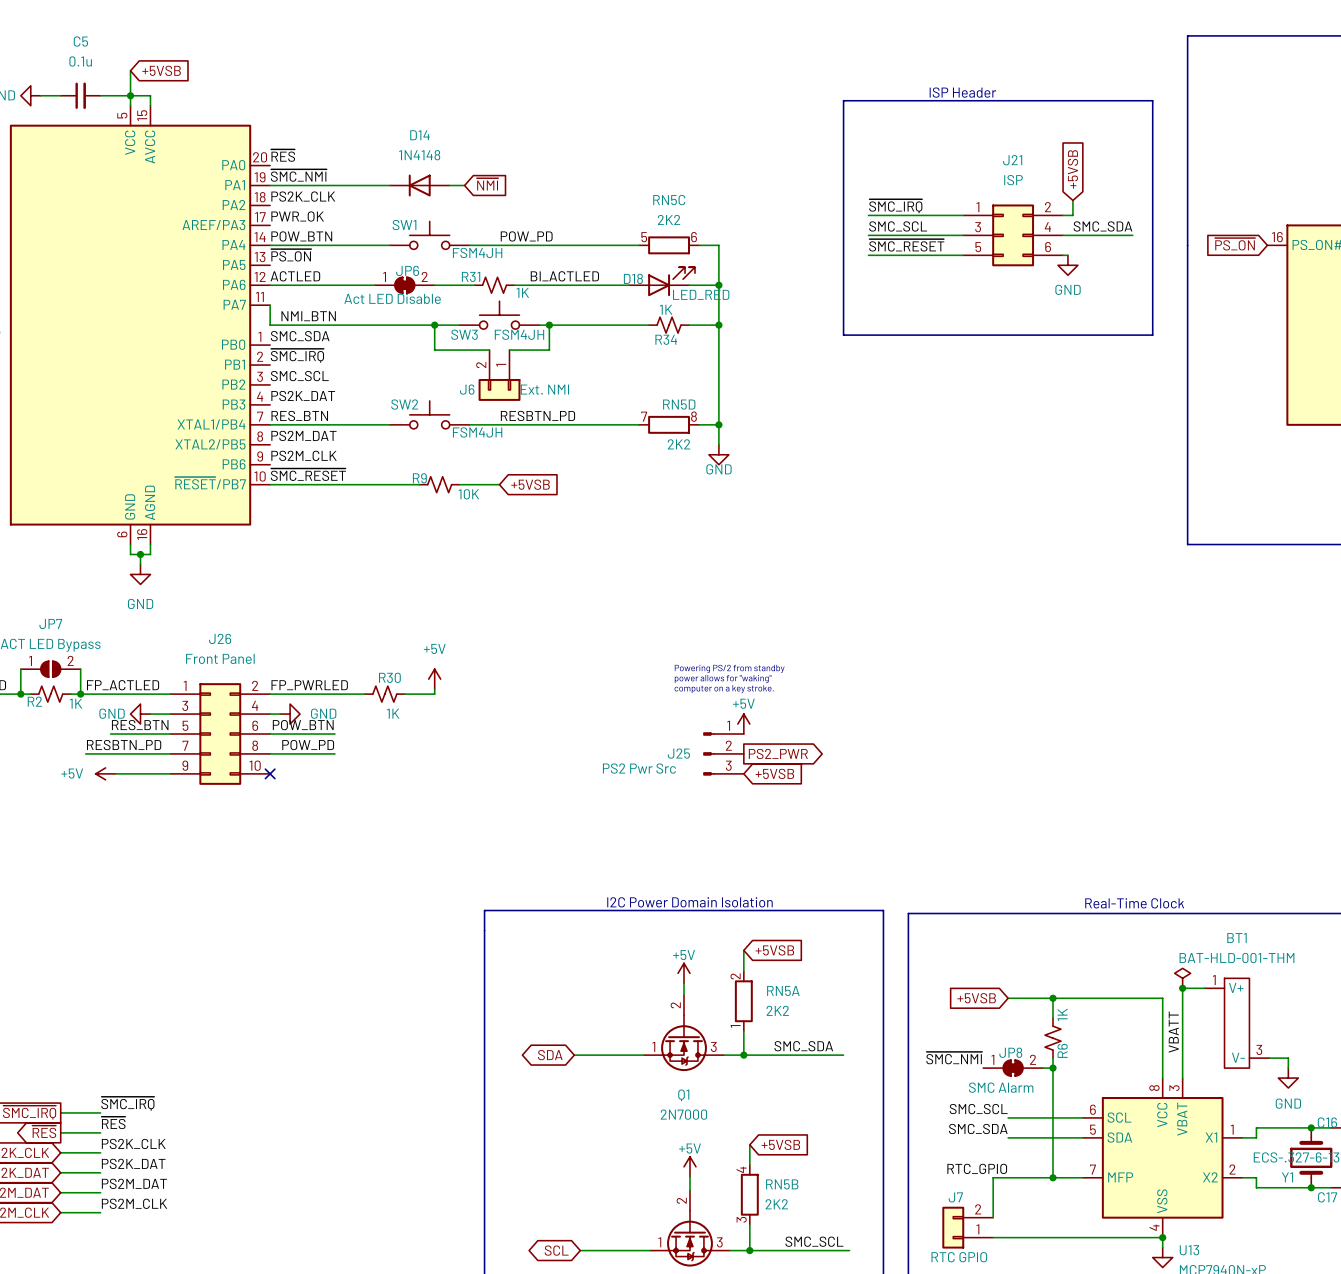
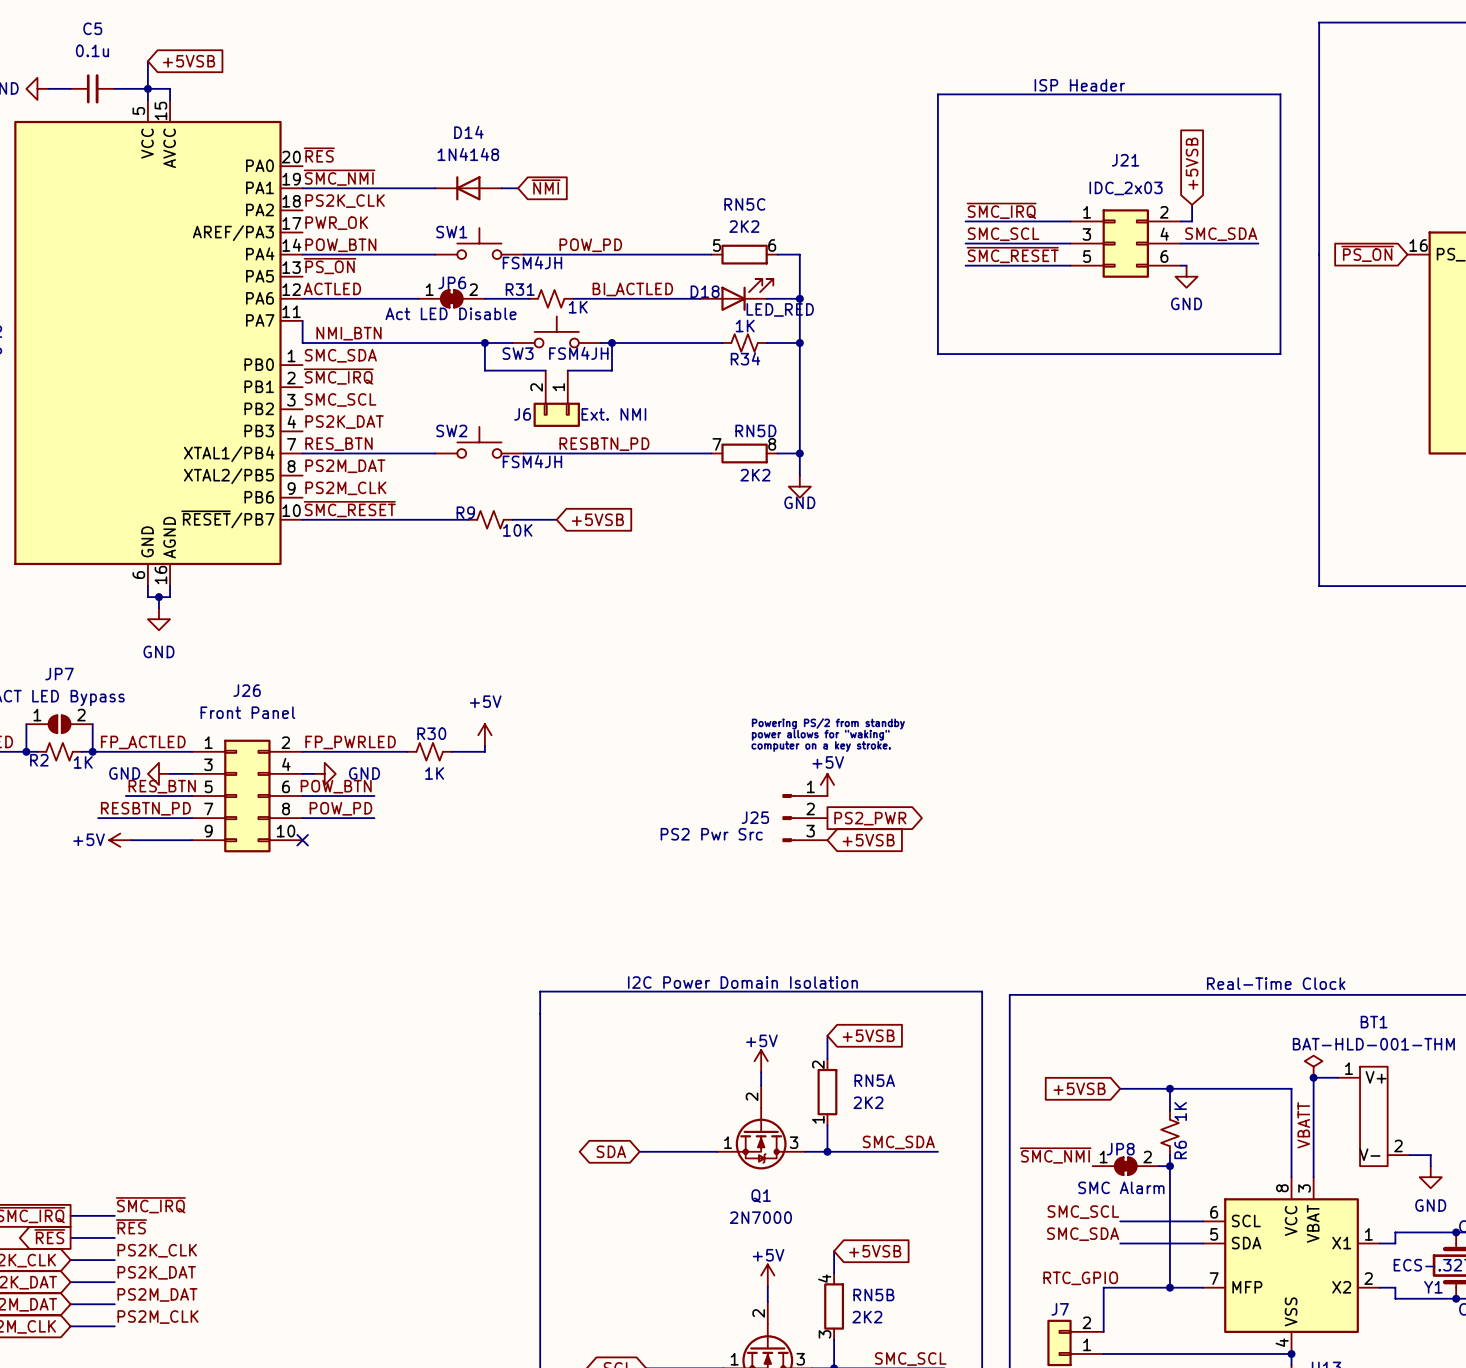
J21 value: ISP (1013, 180) -> IDC_2x03 (1126, 188)
BT1 pin number: 3 (1259, 1049) -> 2 (1398, 1145)

